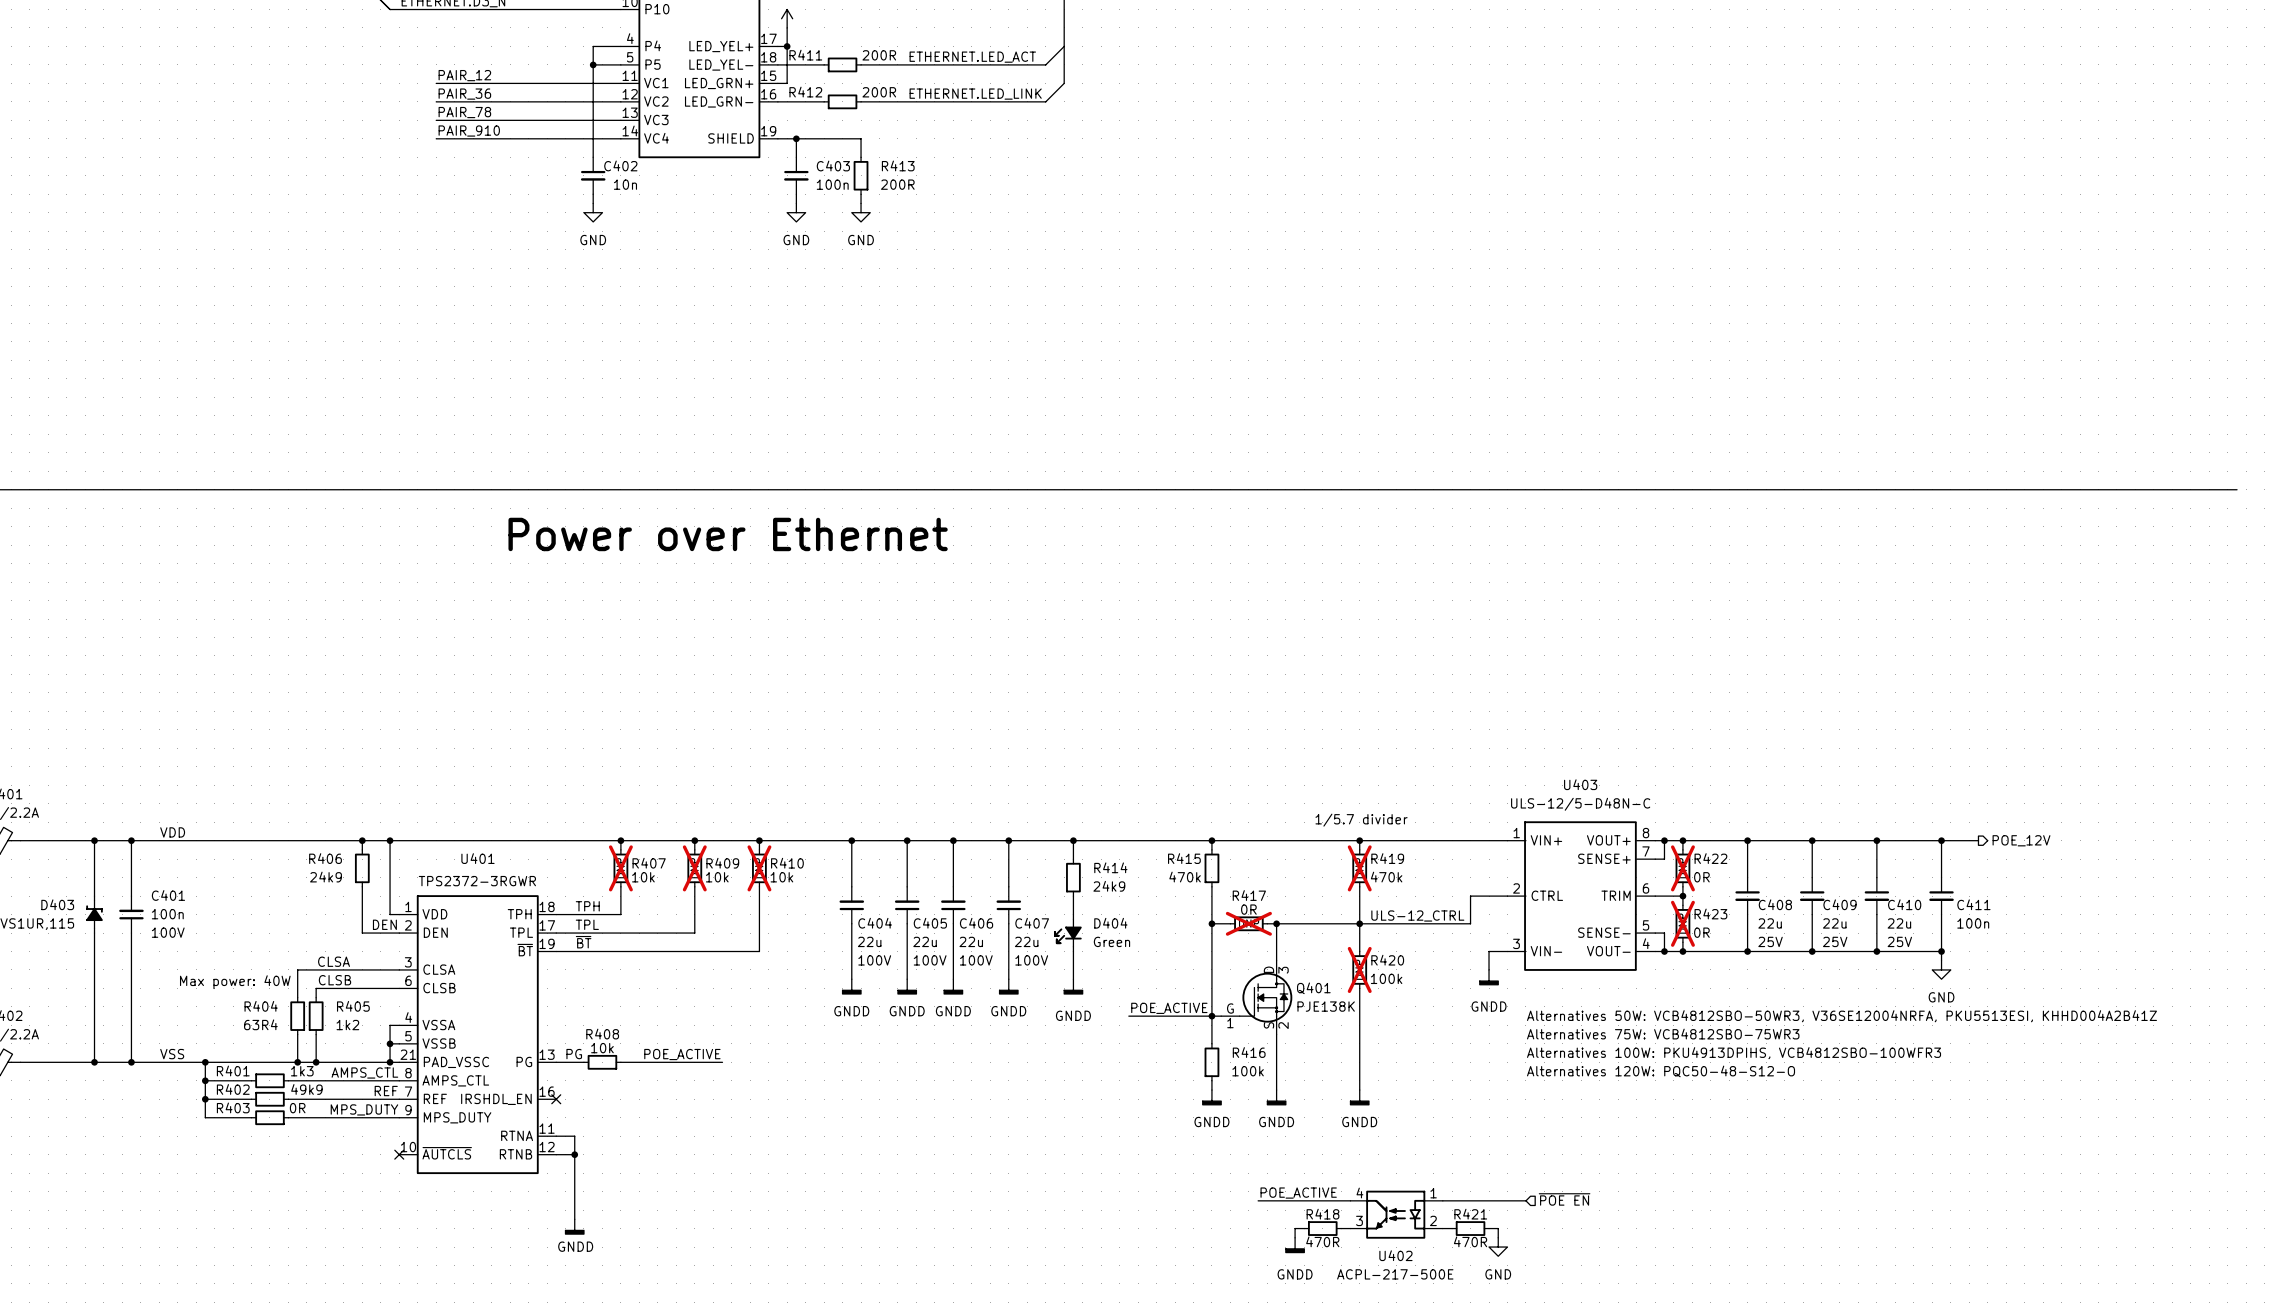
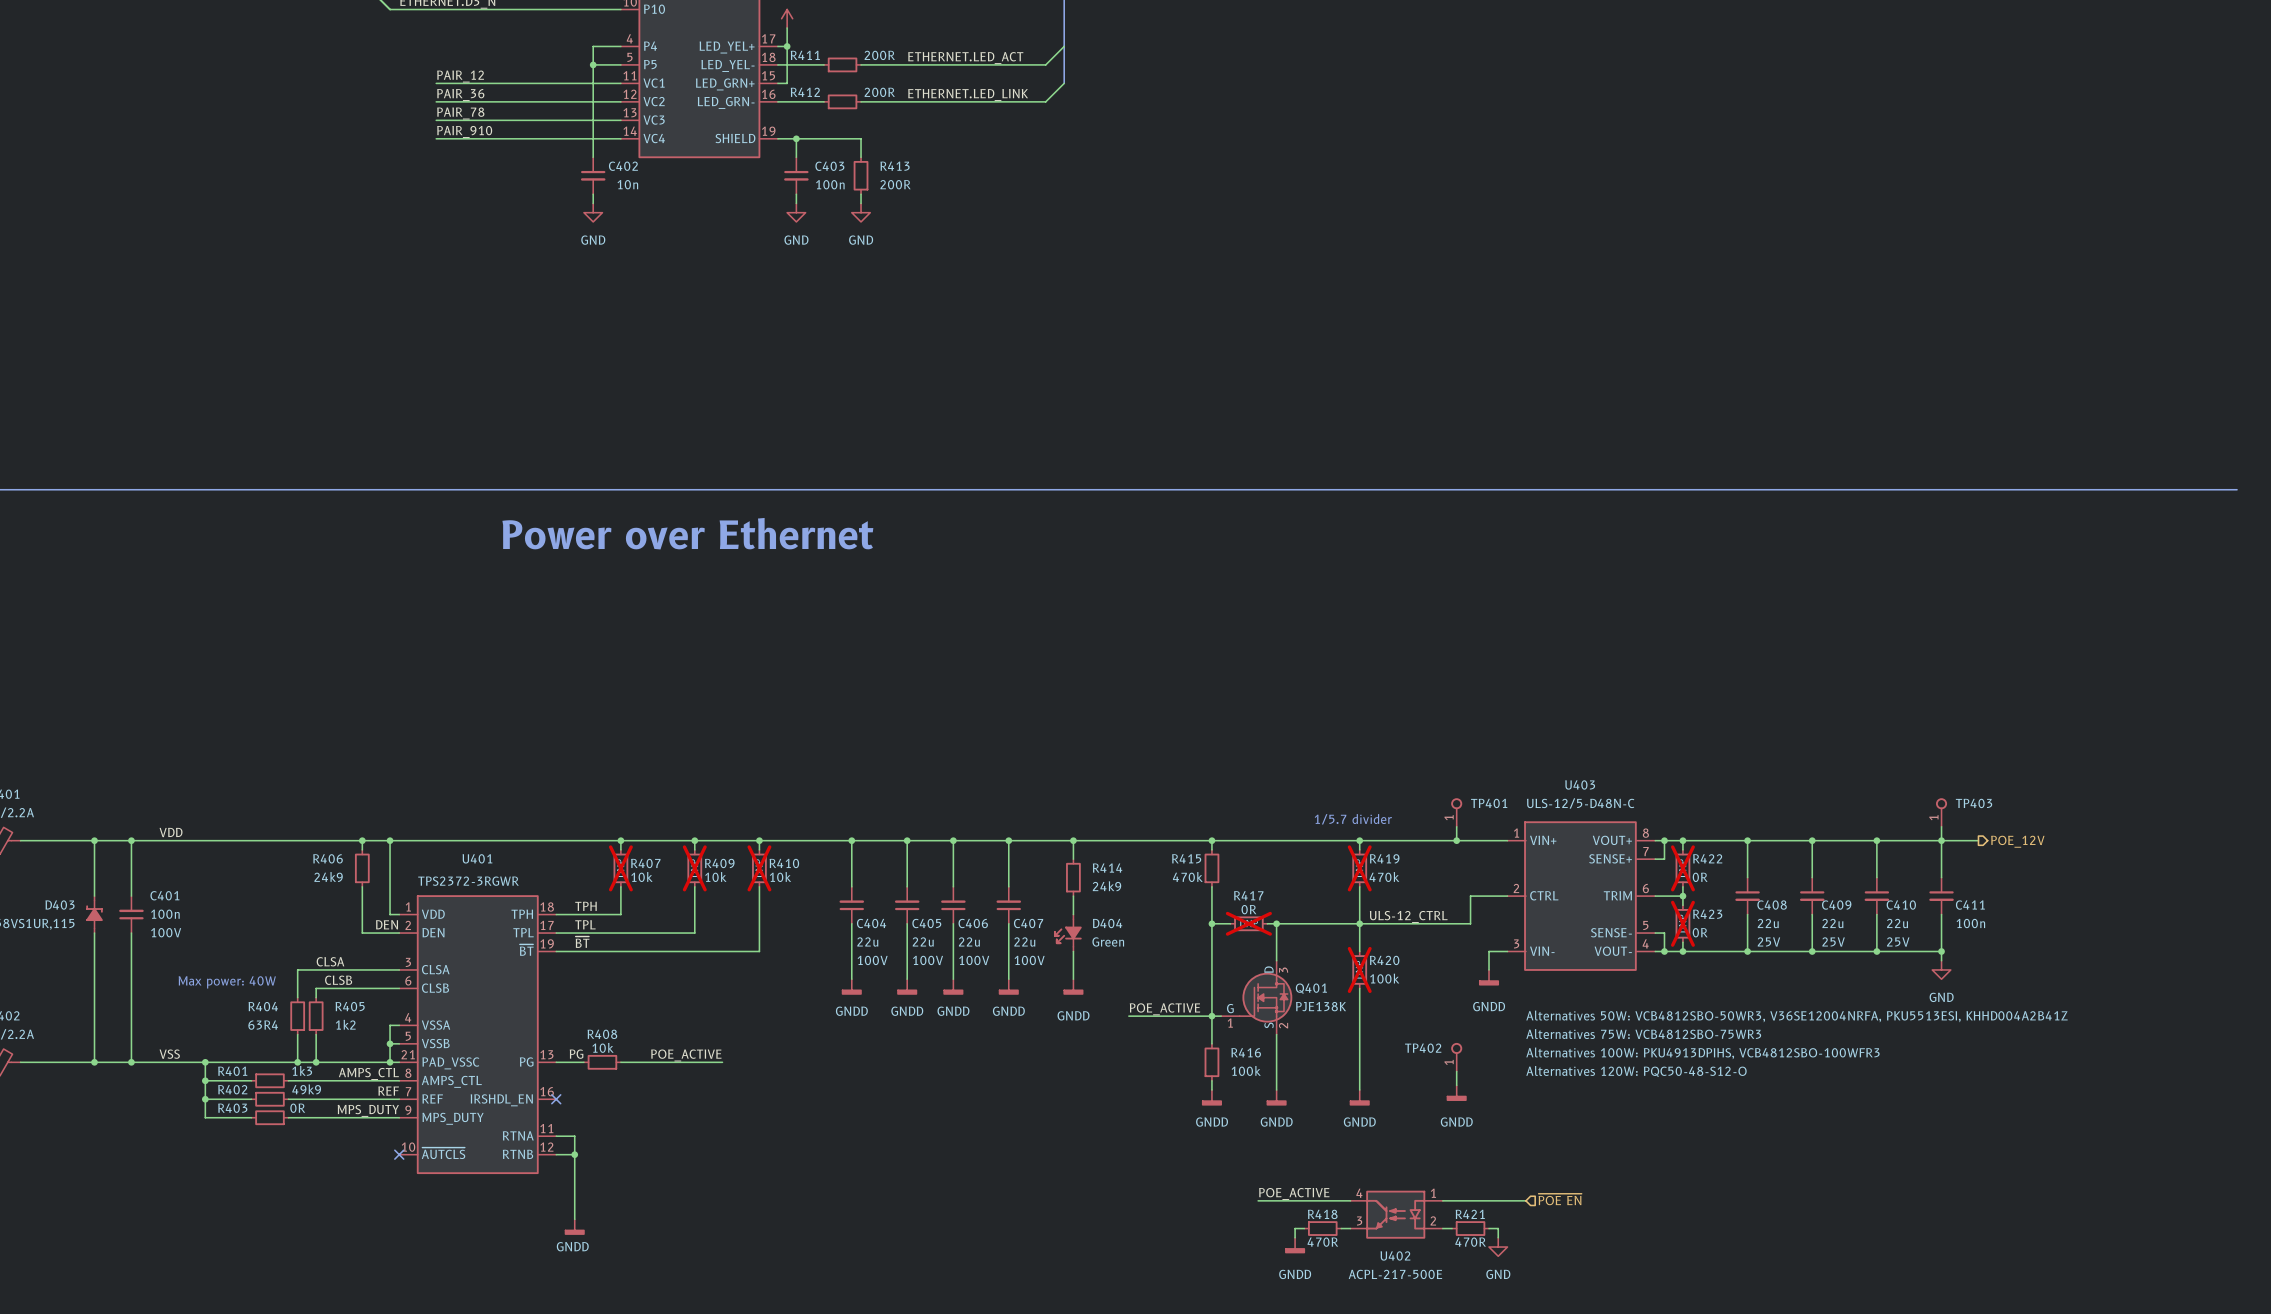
TP401: none -> (1456, 812)
TP403: none -> (1941, 812)
wire: none -> (1456, 826) (1456, 840)
wire: none -> (1941, 826) (1941, 840)
junction: none -> (1456, 840)
TP402: none -> (1456, 1057)
wire: none -> (1456, 1071) (1456, 1085)
power symbol: none -> GNDD (1456, 1092)

